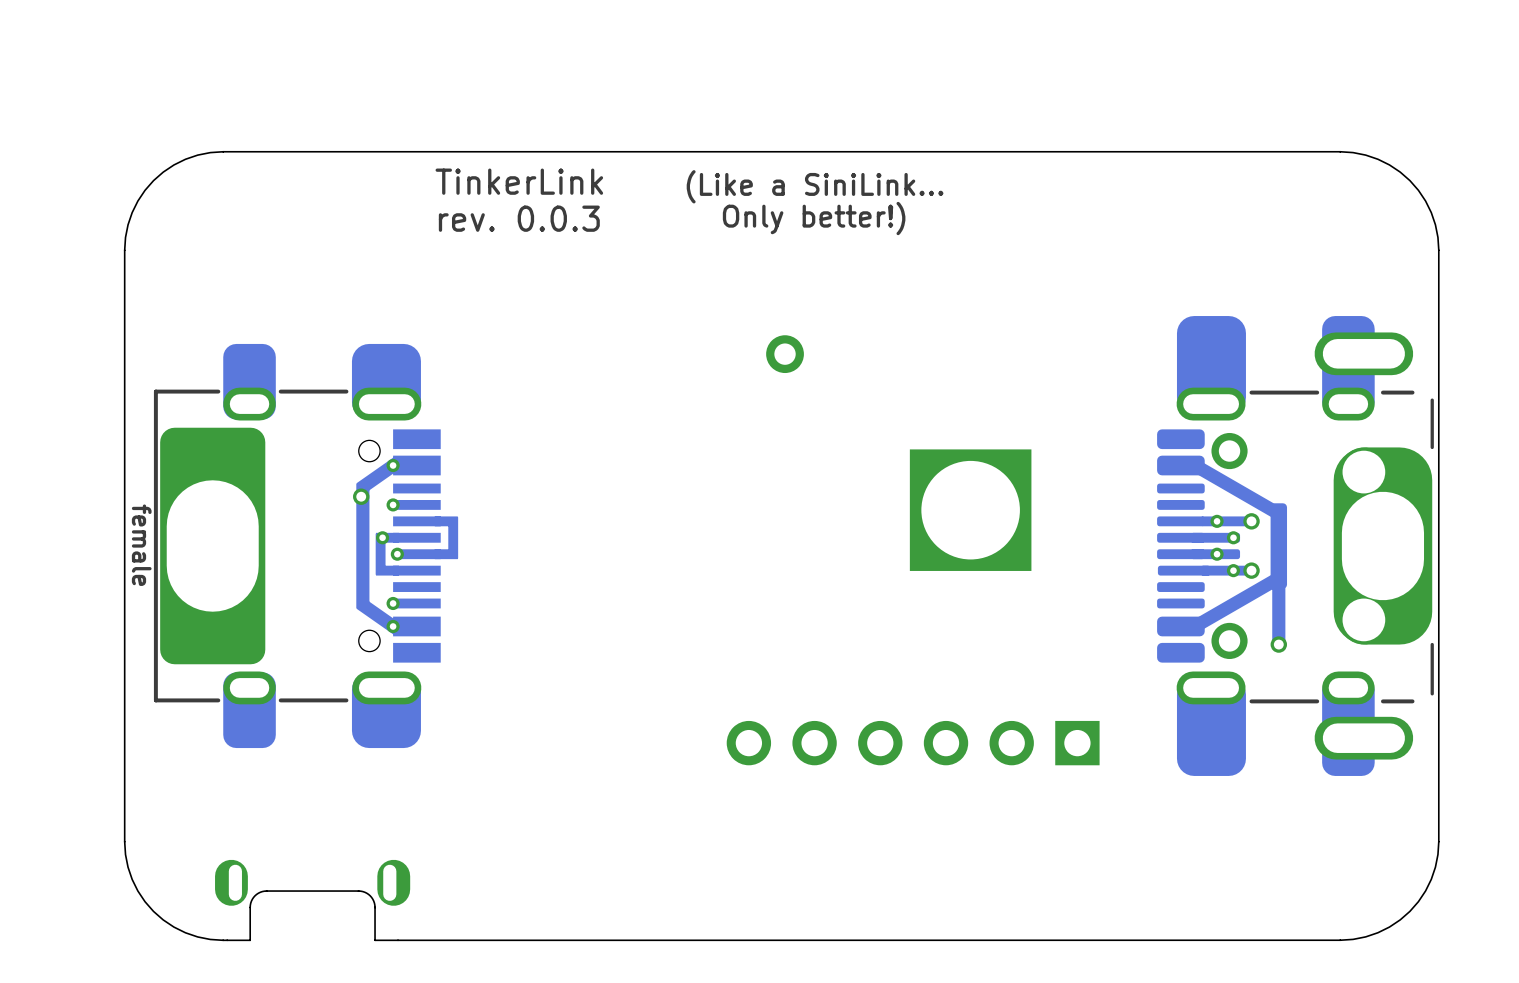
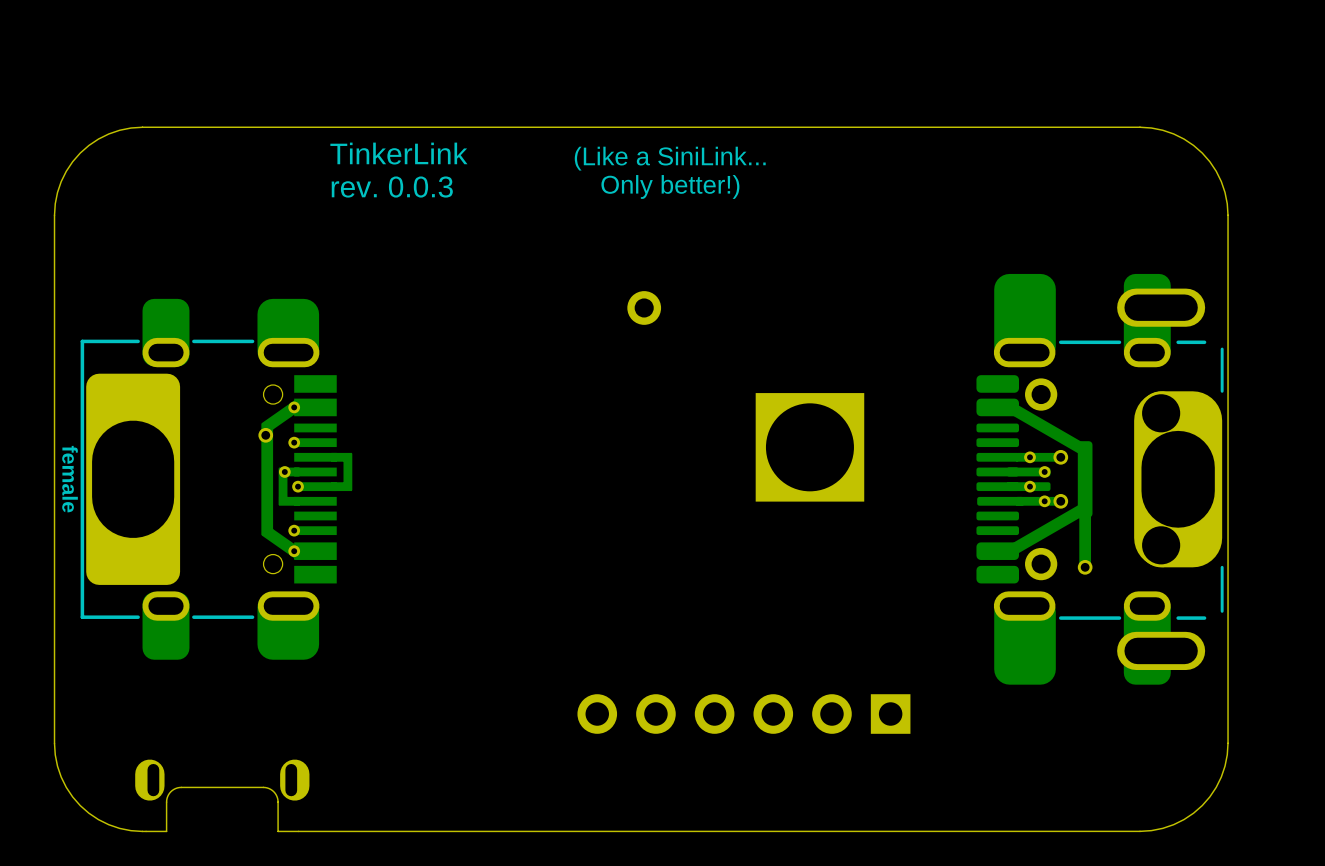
part position: (913, 743) -> (743, 714)

